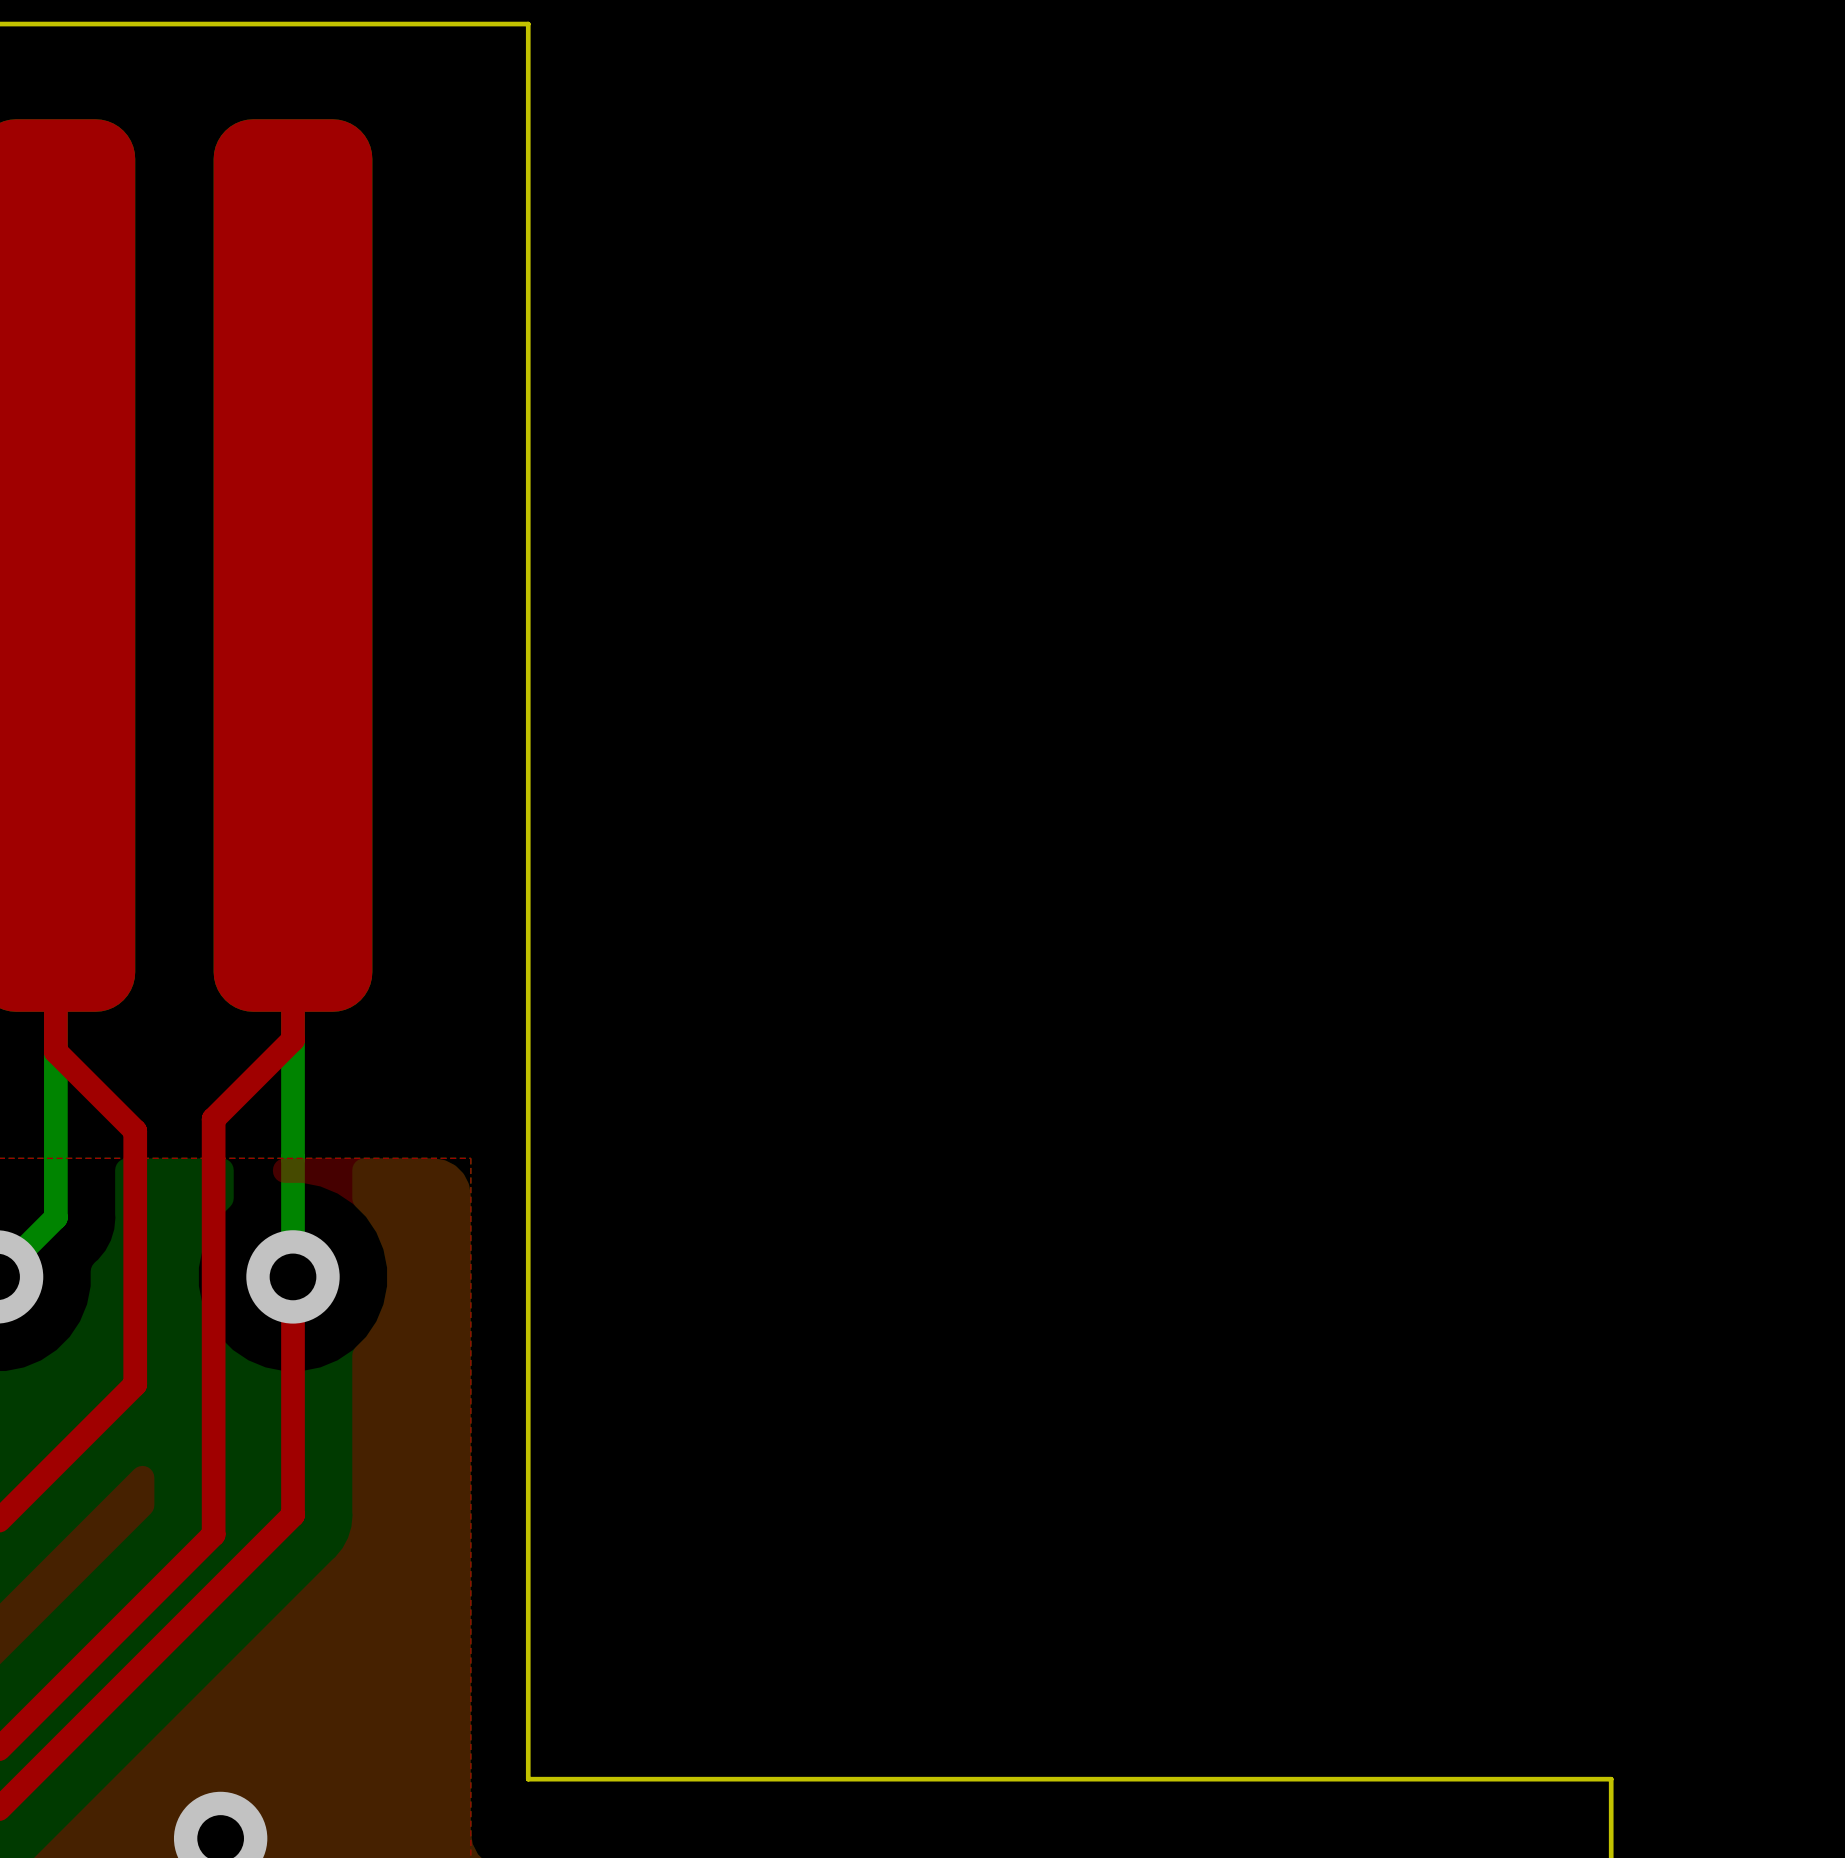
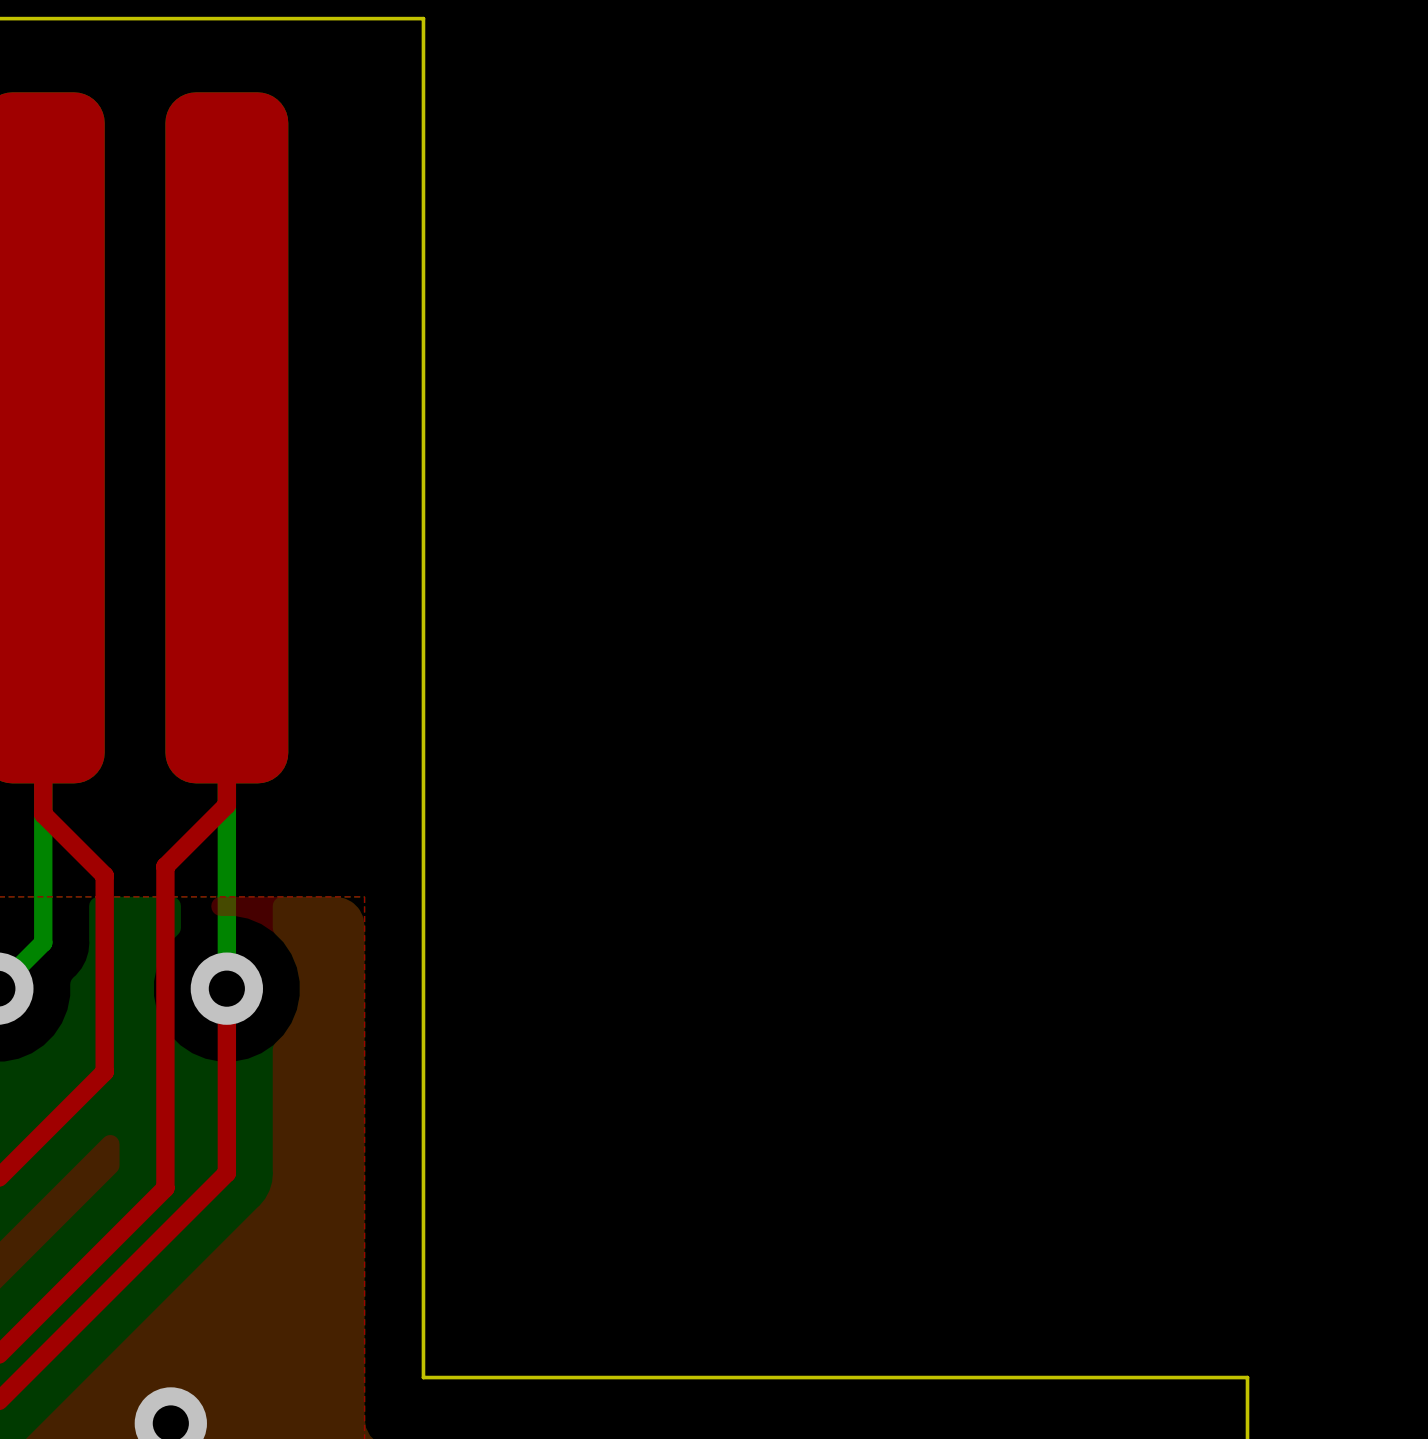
board edge: (528, 24) (528, 1779) (546, 1779) -> (409, 18) (423, 18) (423, 1377)

